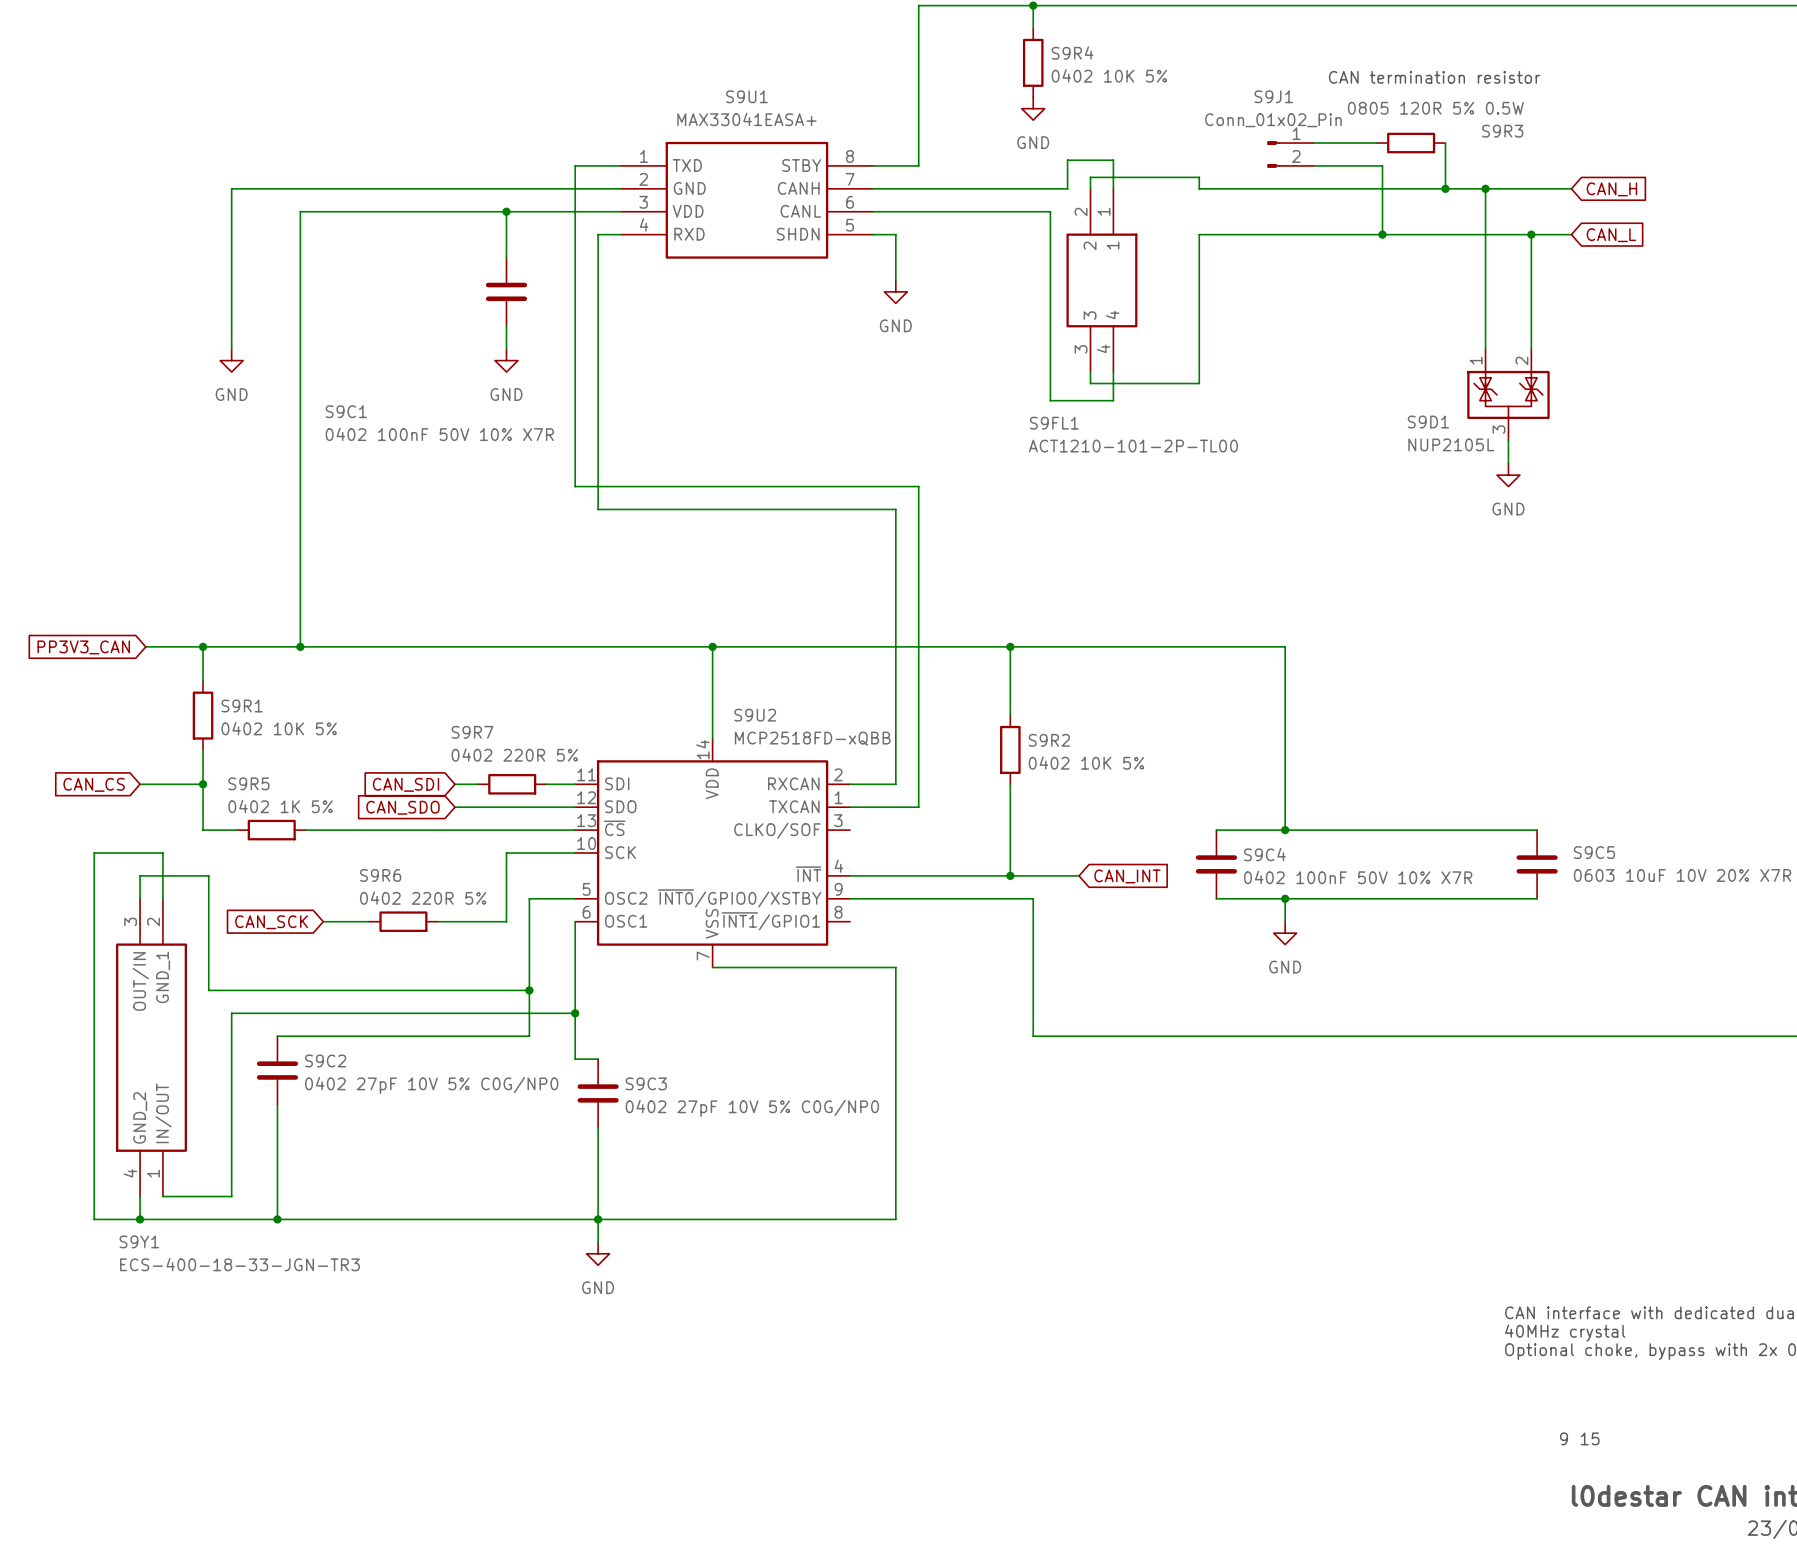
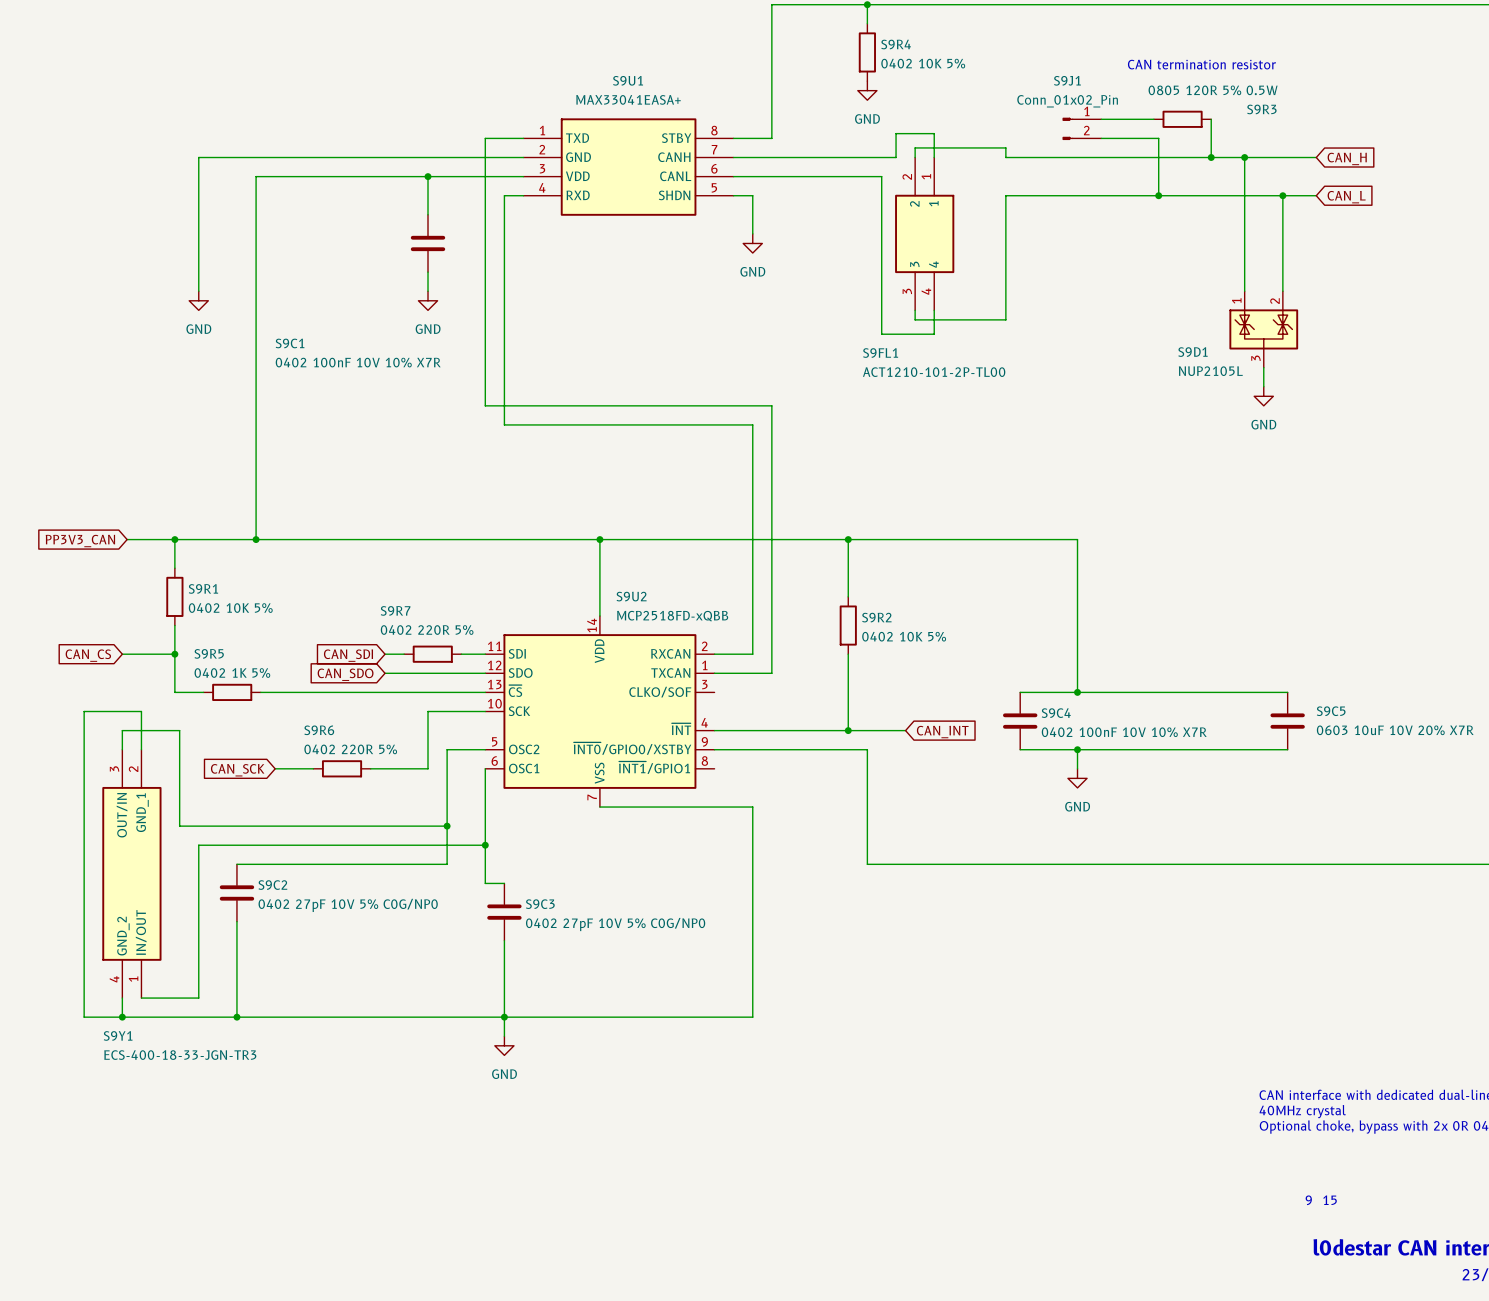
S9C1 value: 0402 100nF 50V 10% X7R (439, 434) -> 0402 100nF 10V 10% X7R (358, 362)
S9C4 value: 0402 100nF 50V 10% X7R (1358, 877) -> 0402 100nF 10V 10% X7R (1124, 732)

